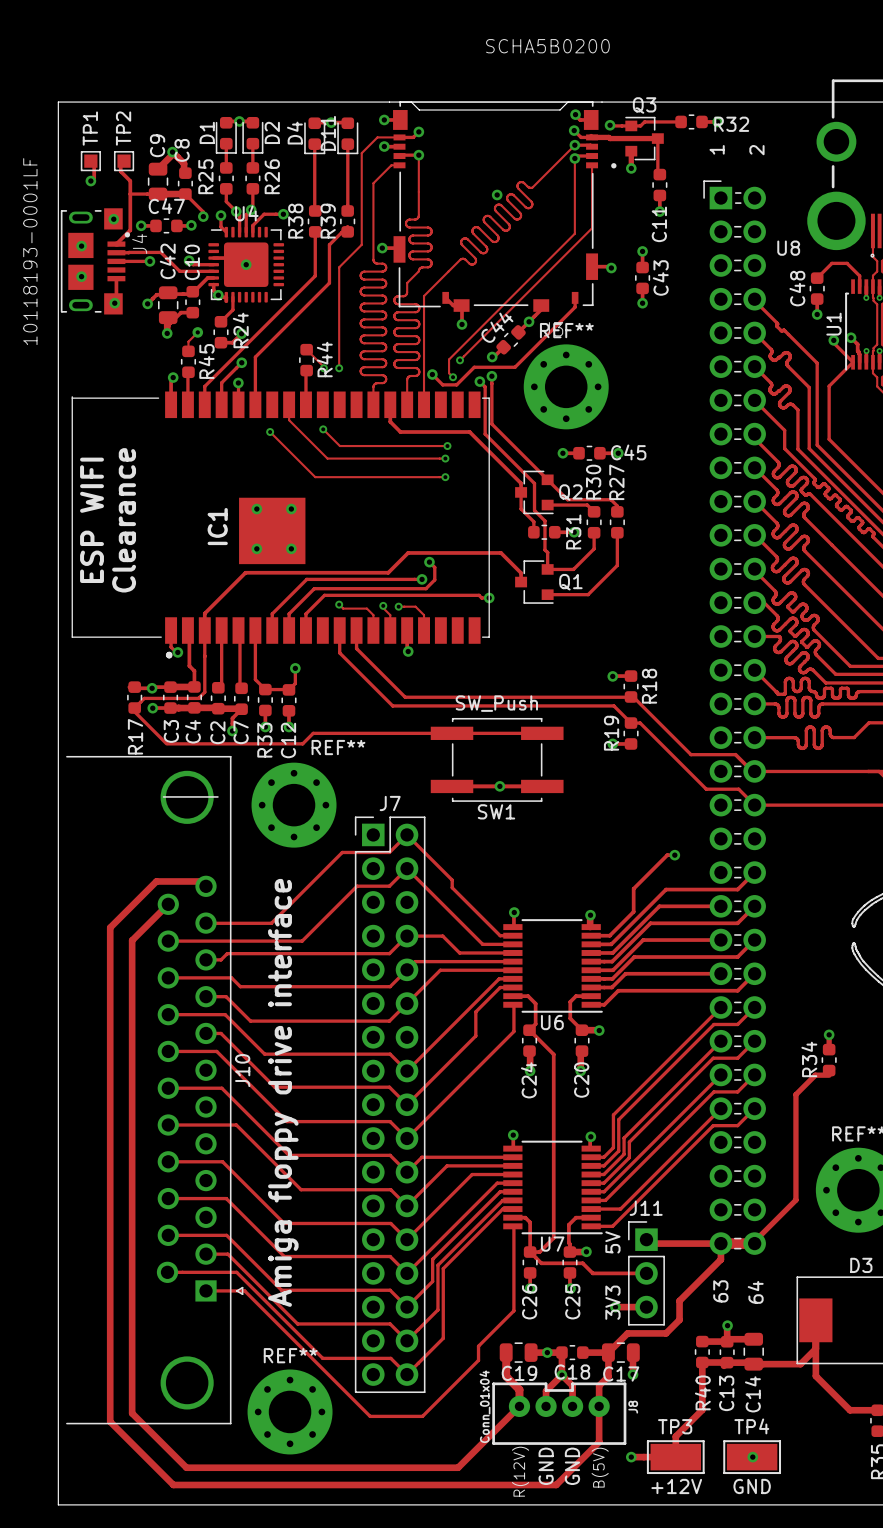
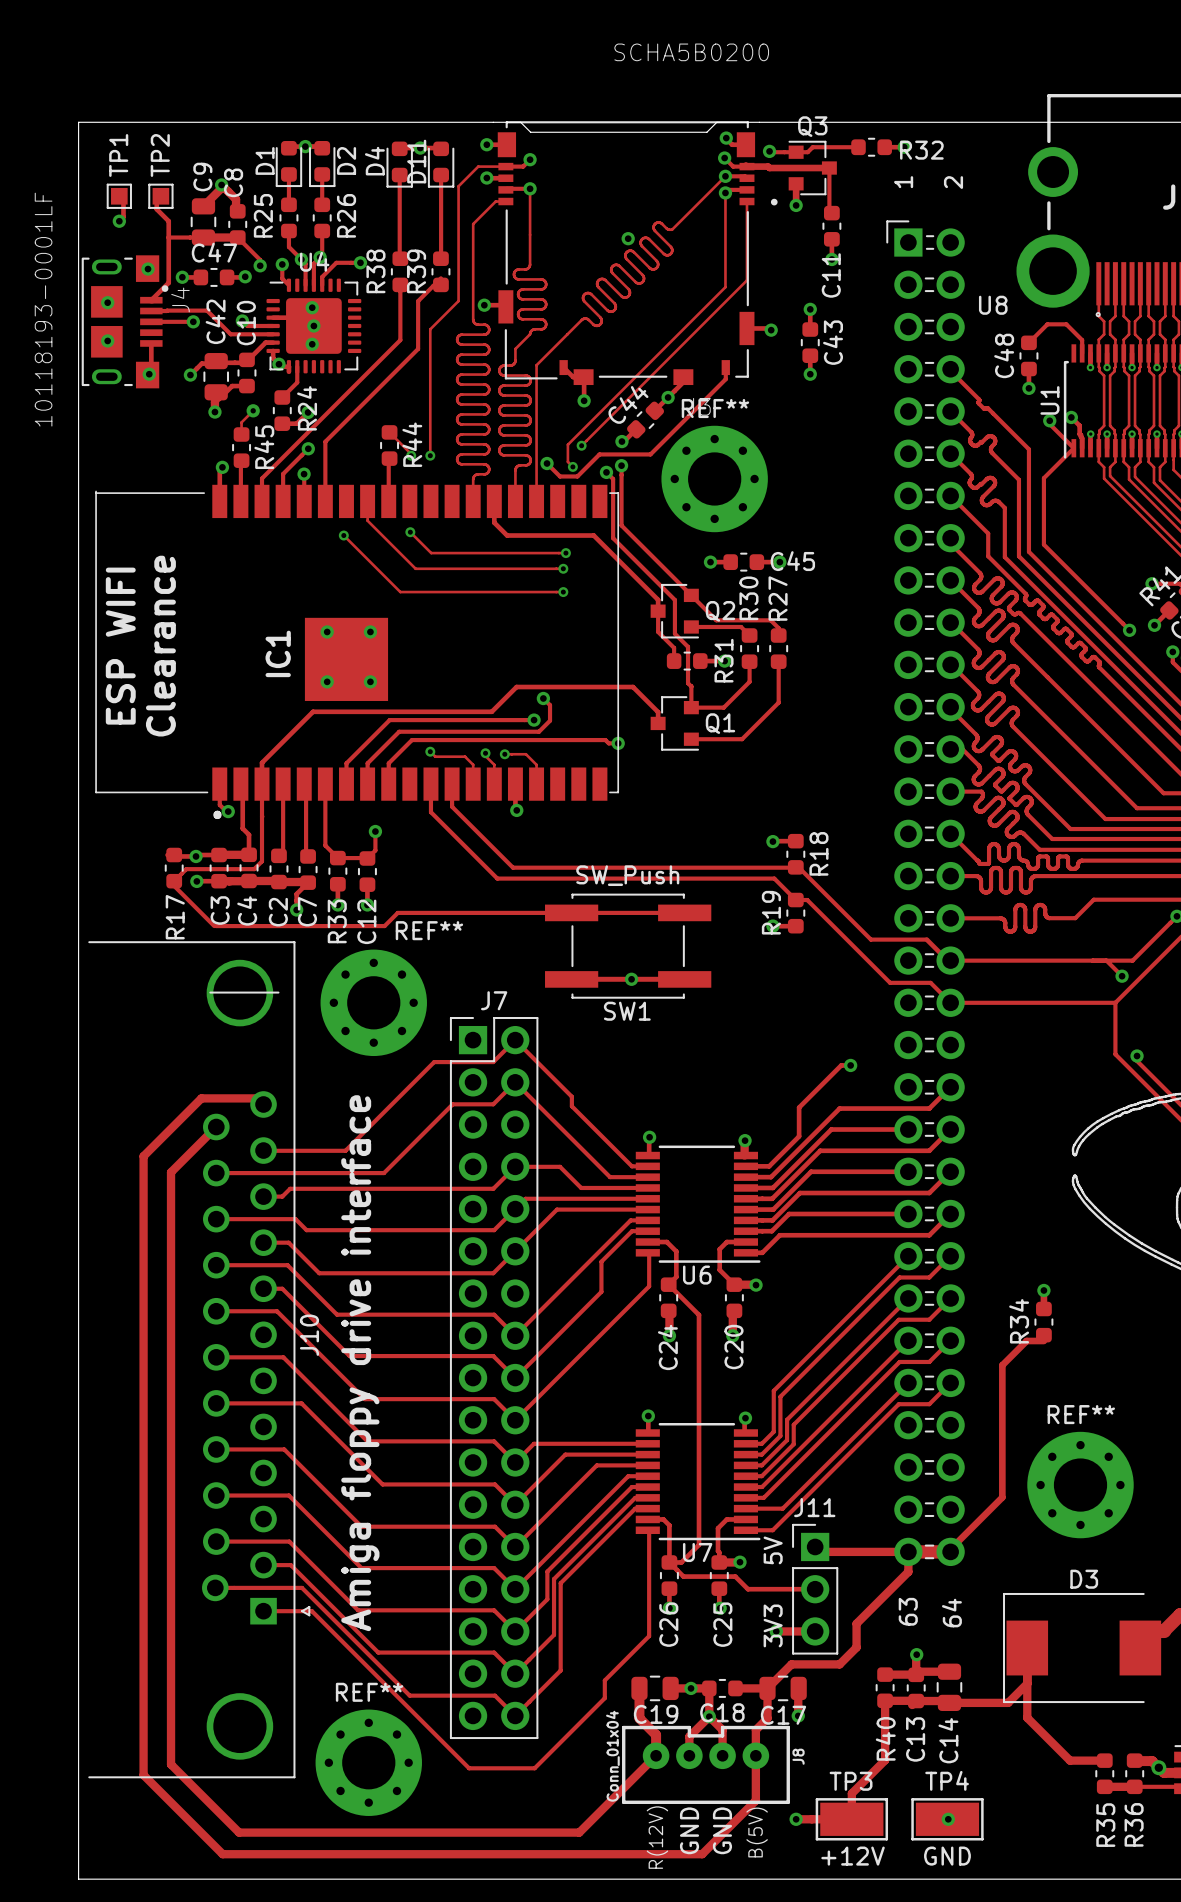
via: none -> (312, 307)
via: none -> (312, 344)

